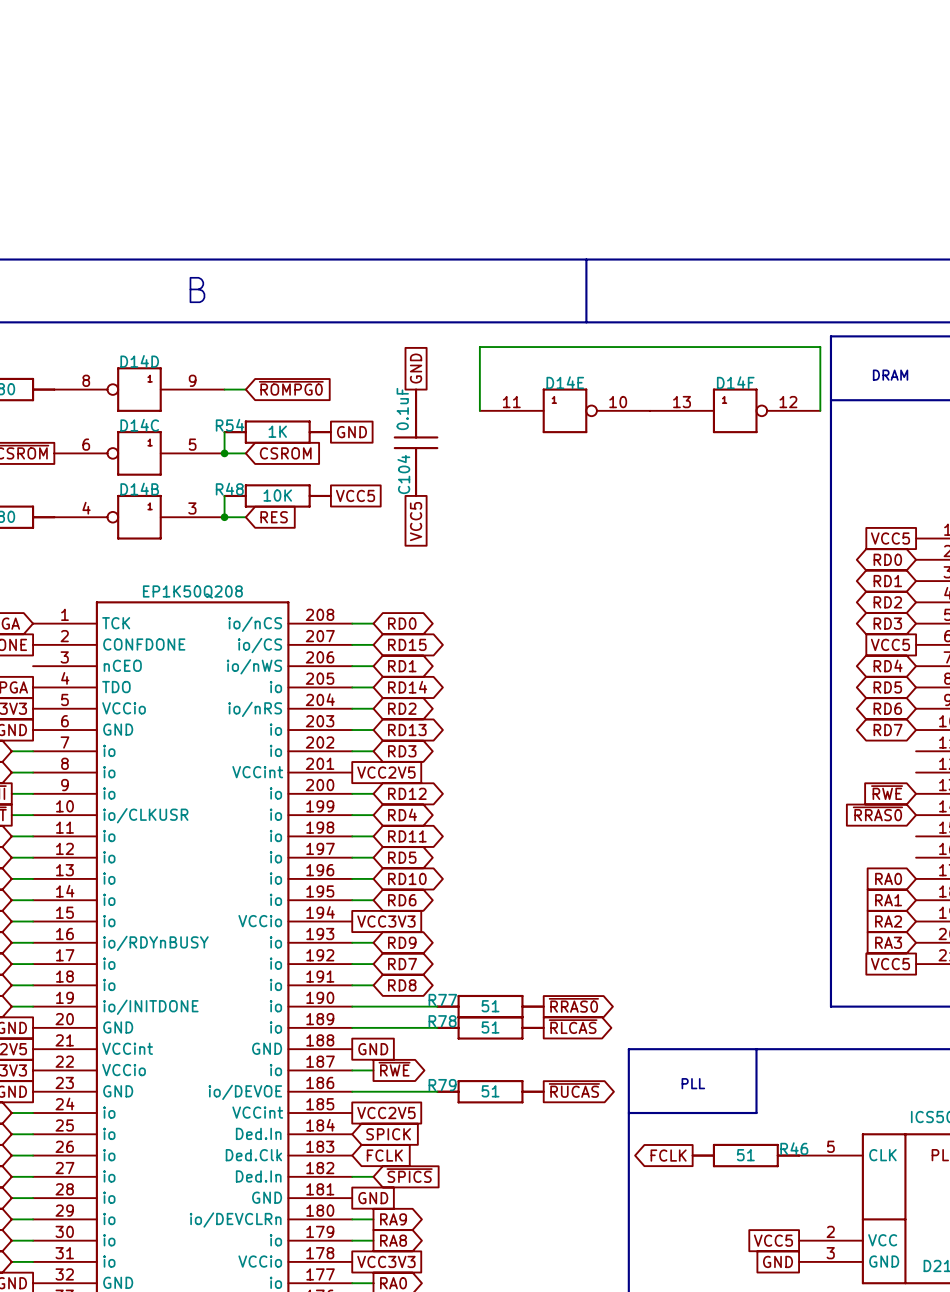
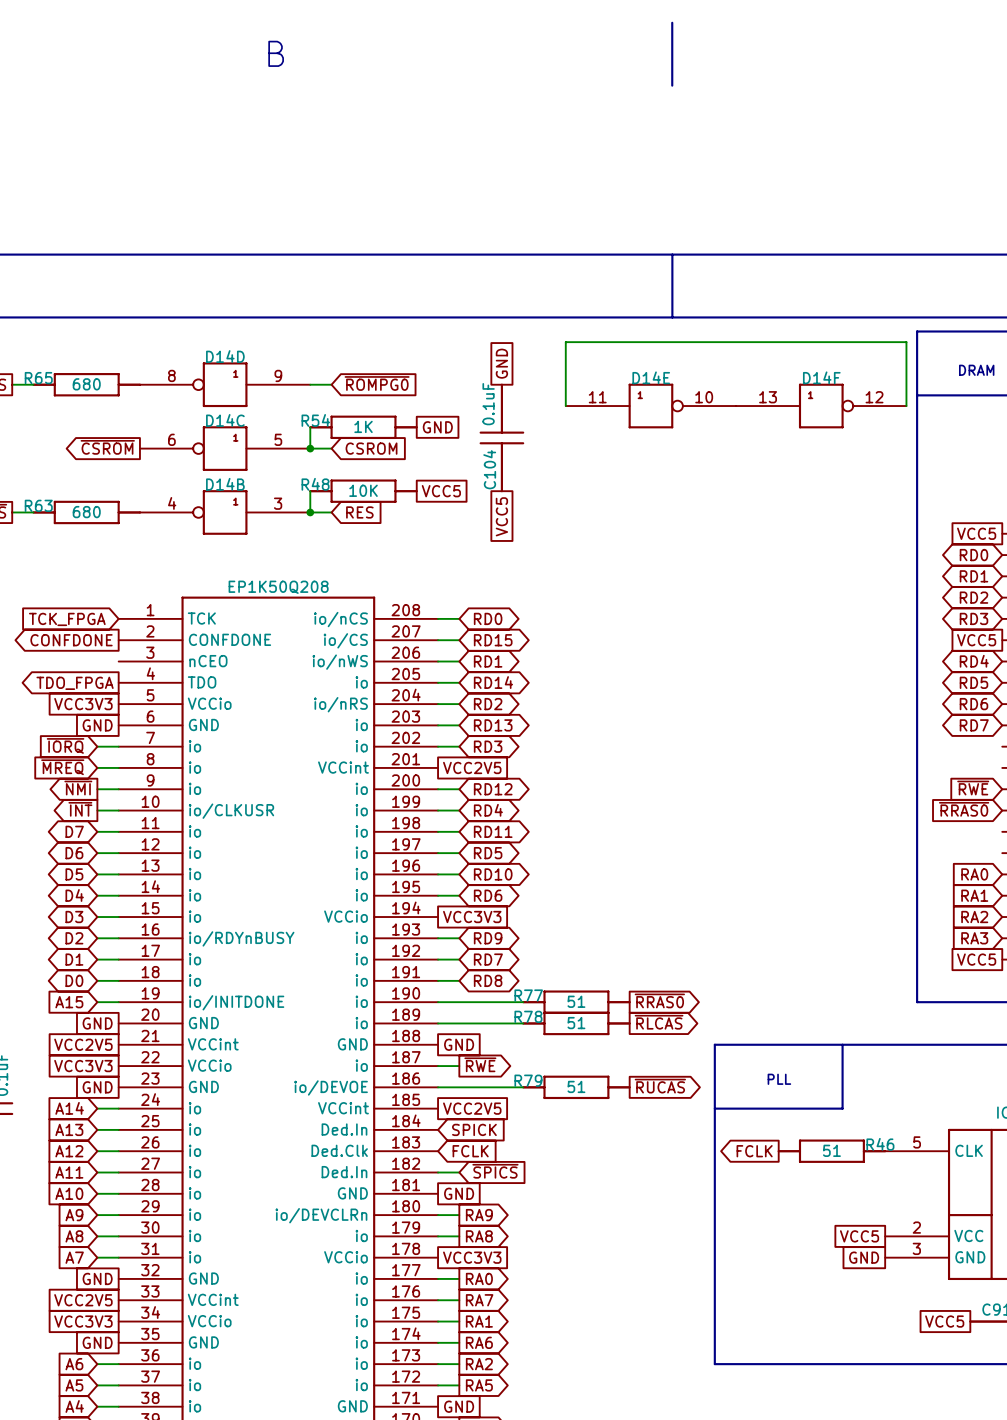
line: none -> (672, 22) (672, 85)
text: none -> B (276, 53)
text: B (197, 290) -> none

